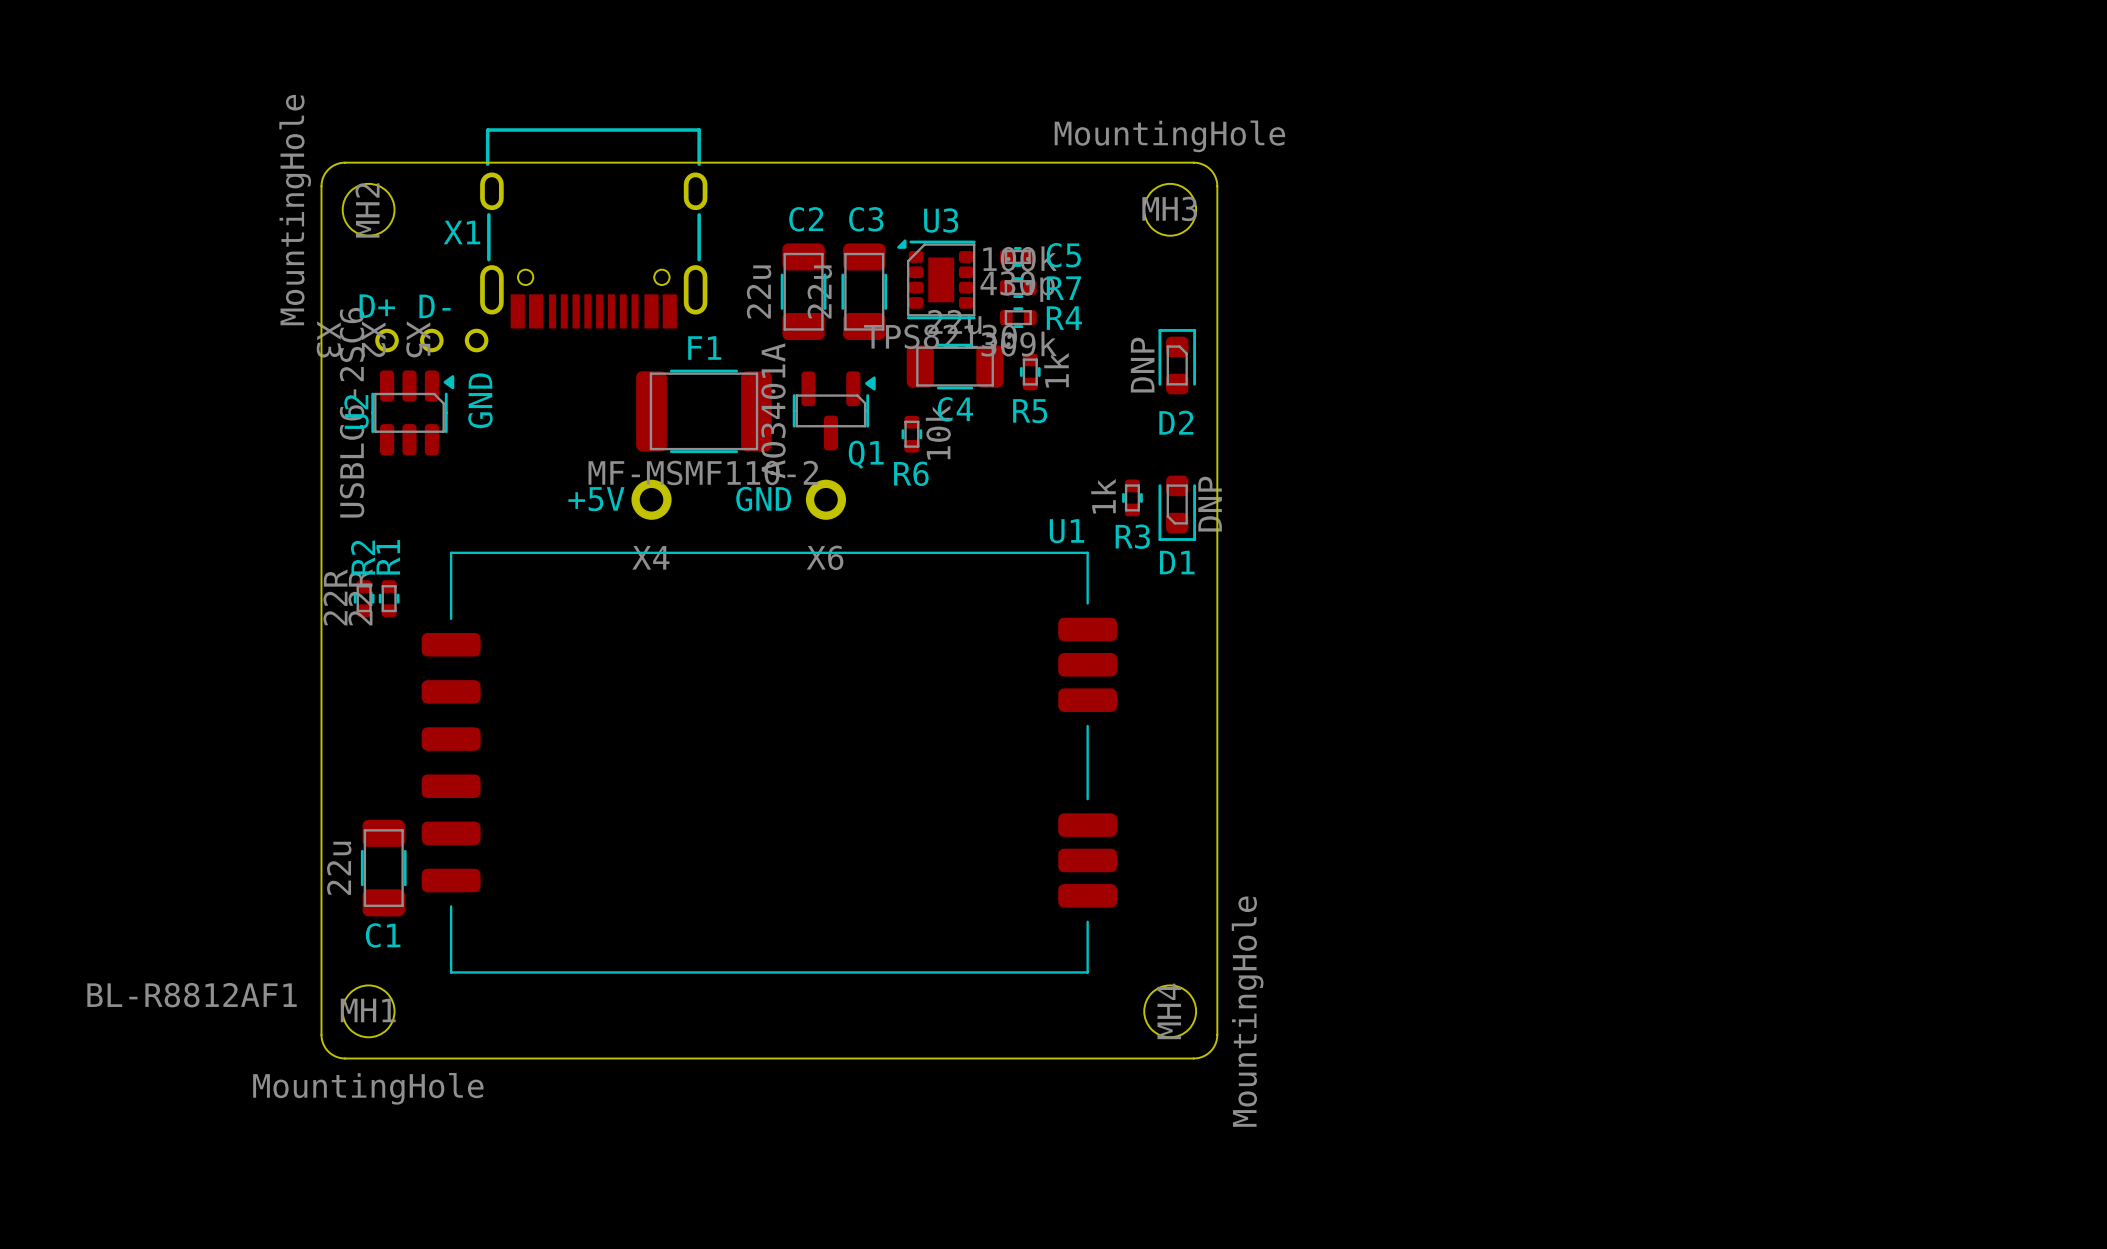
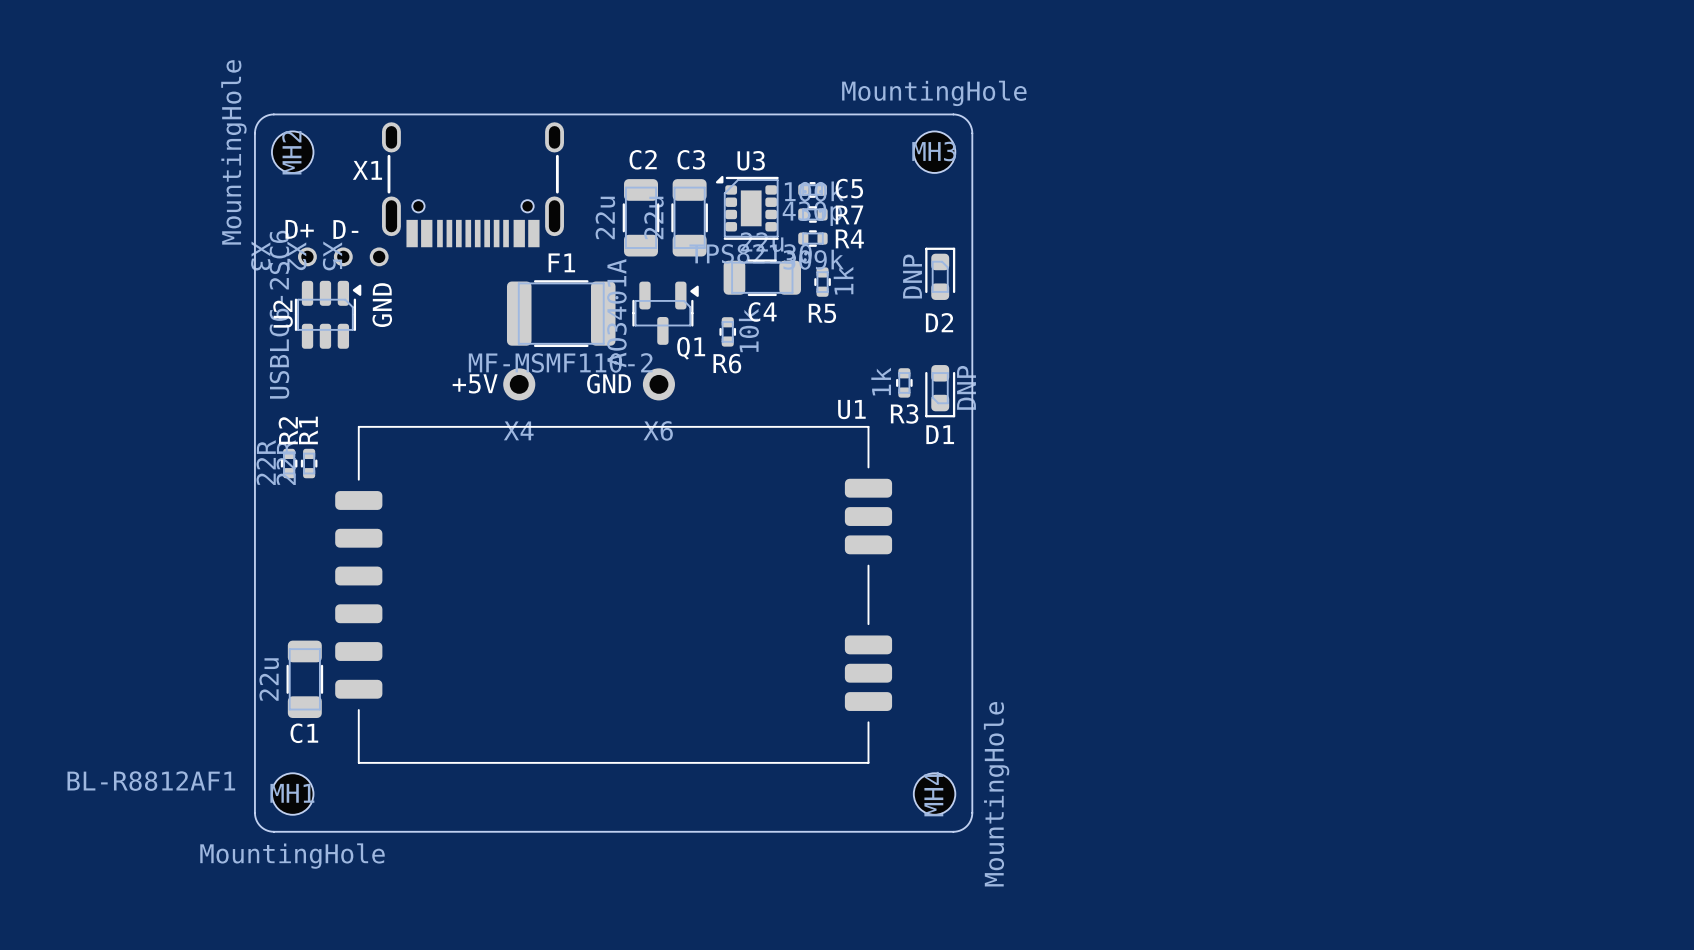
X1 footprint: [480, 128, 708, 329] -> [382, 122, 564, 248]

